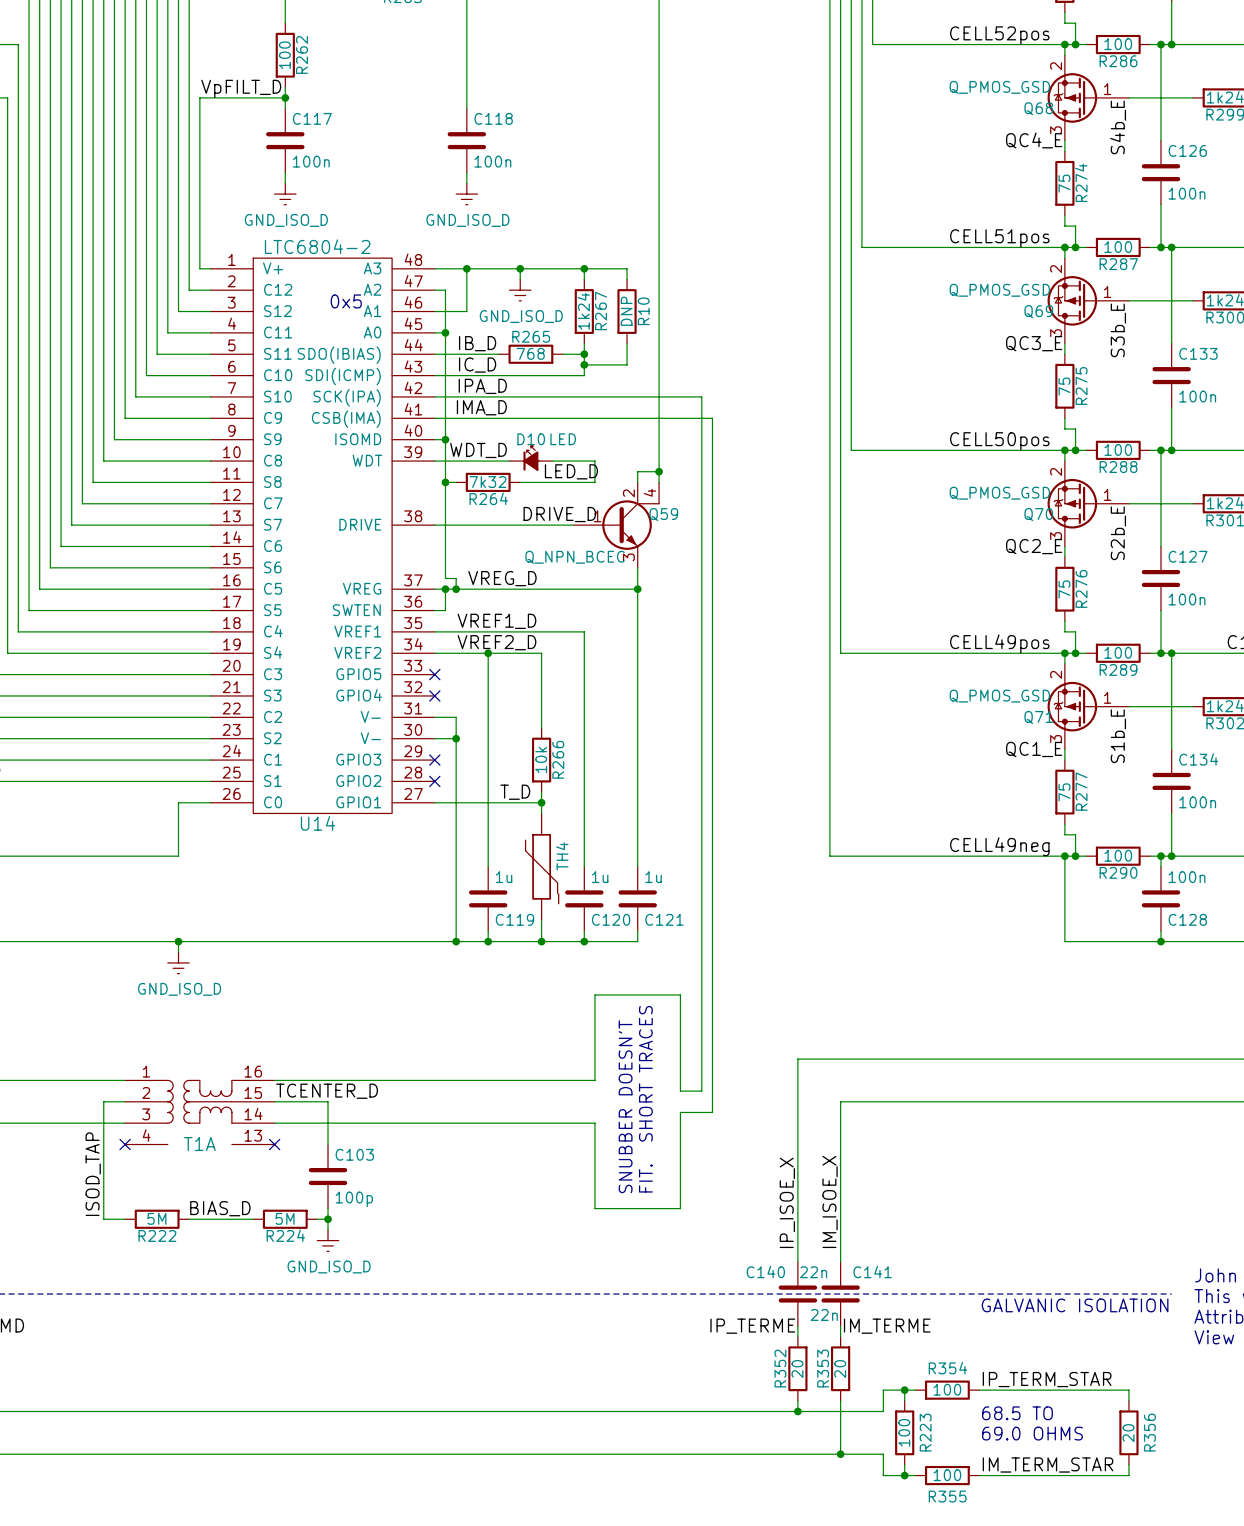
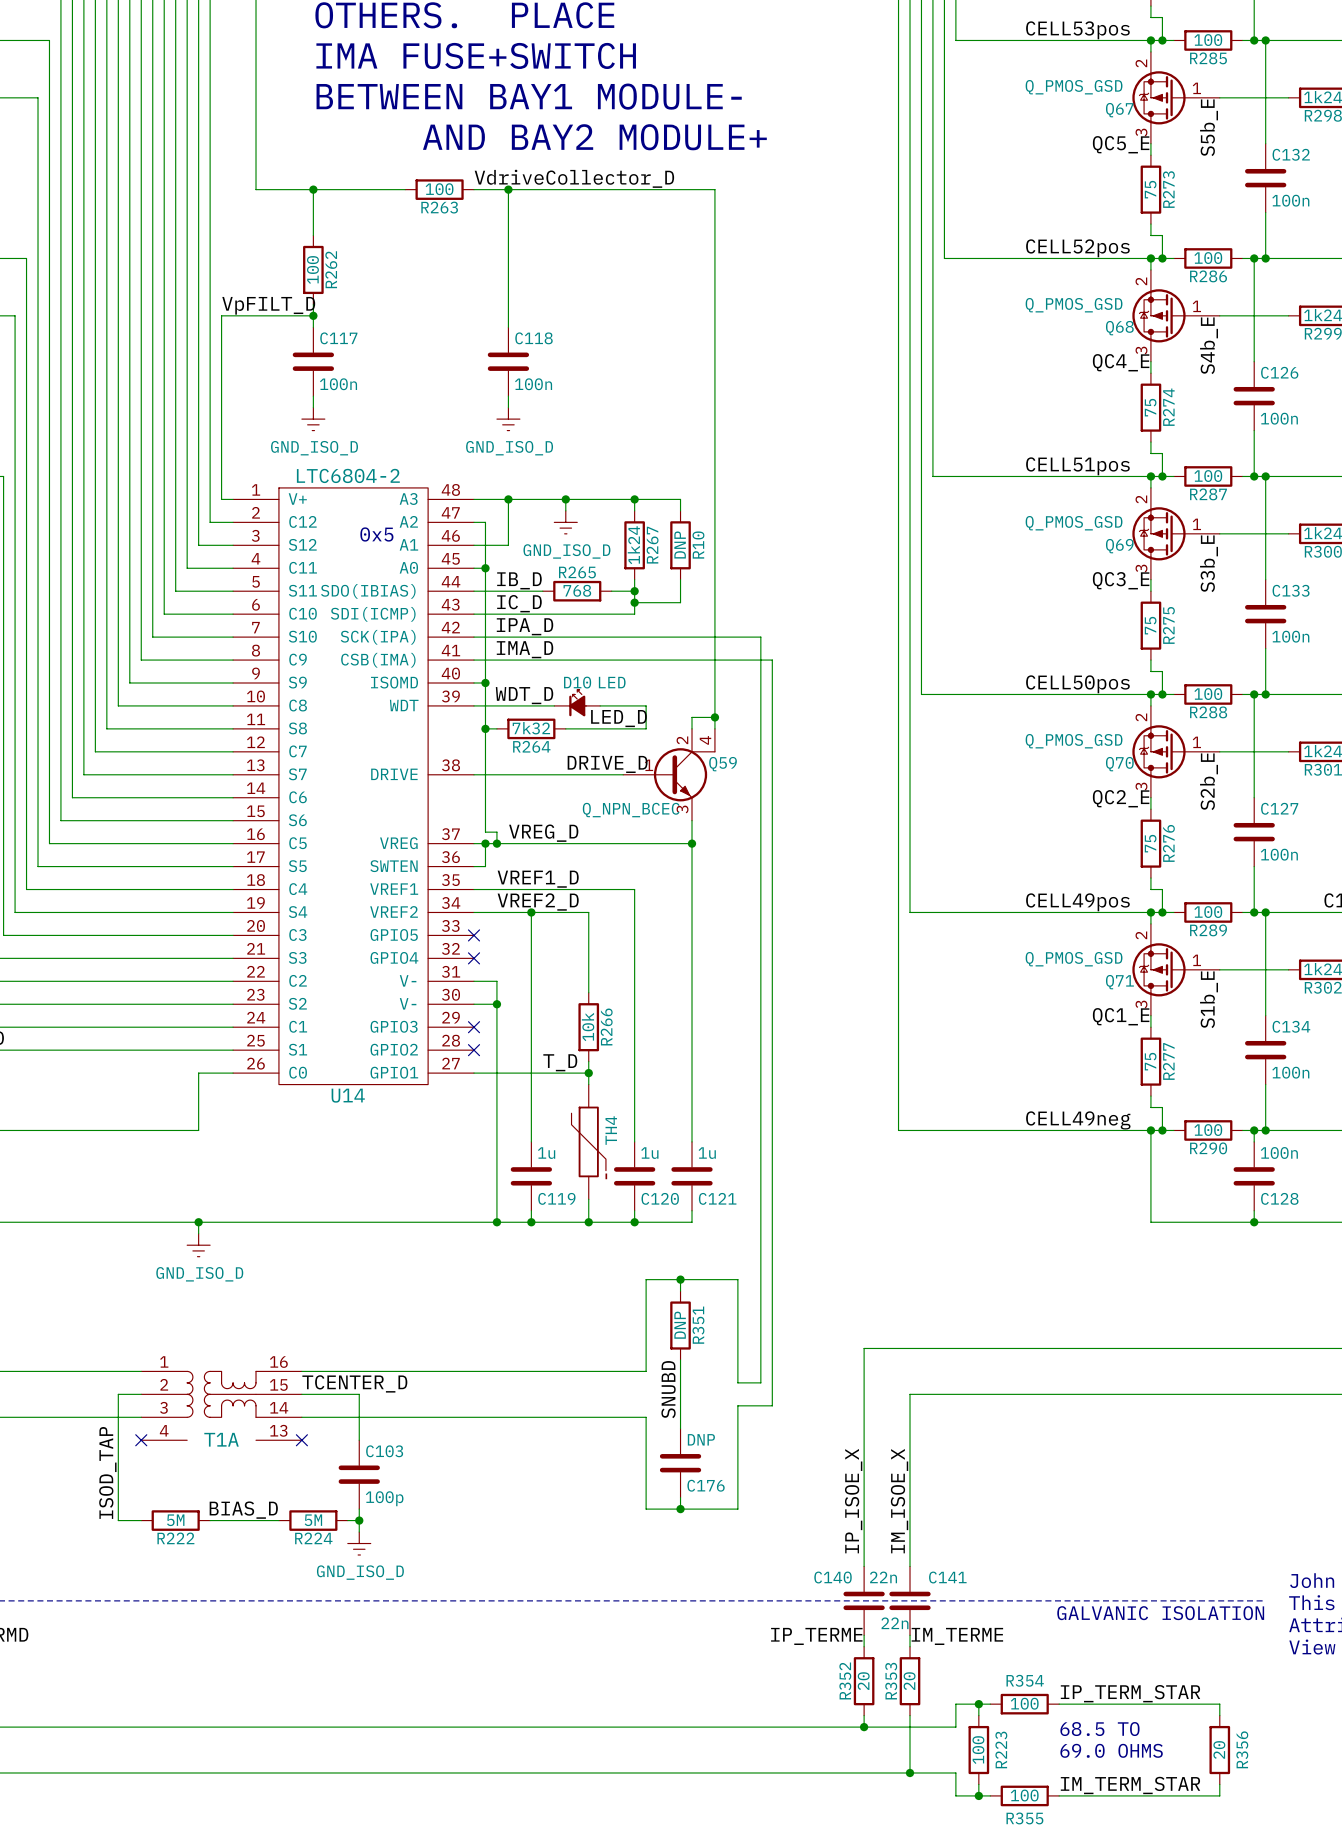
wire: none -> (680, 1279) (680, 1291)
junction: none -> (680, 1279)
R351: none -> DNP (680, 1325)
wire: none -> (680, 1359) (680, 1428)
text: FIT. SHORT TRACES (645, 1099) -> none
label: none -> SNUBD (668, 1389)
text: SNUBBER DOESN'T (625, 1106) -> none
C176: none -> DNP (680, 1463)
wire: none -> (680, 1497) (680, 1509)
junction: none -> (680, 1509)

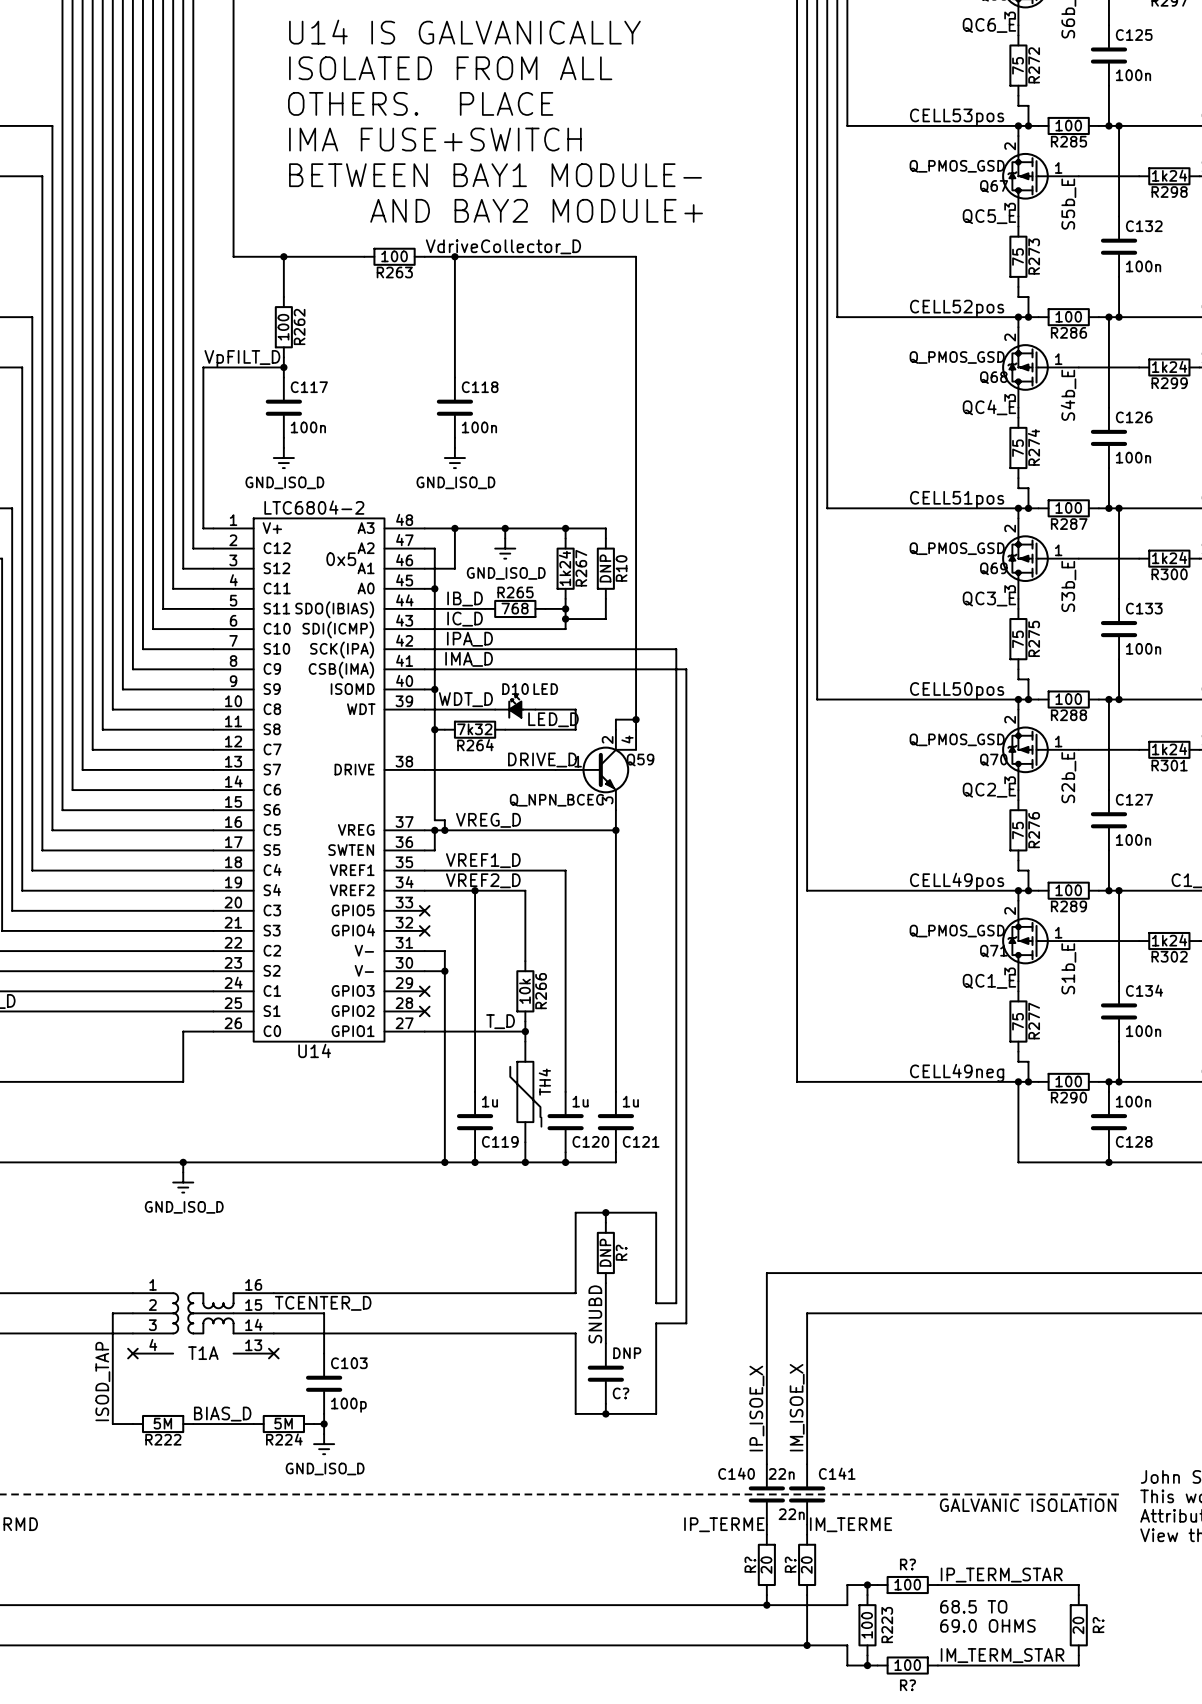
R351 name: R351 (698, 1325) -> R? (621, 1252)
C176 name: C176 (706, 1485) -> C? (621, 1393)
R352 name: R352 (845, 1680) -> R? (750, 1564)
R354 name: R354 (1025, 1680) -> R? (907, 1564)
R353 name: R353 (891, 1681) -> R? (790, 1564)
R356 name: R356 (1242, 1749) -> R? (1098, 1625)
R355 name: R355 (1024, 1818) -> R? (907, 1685)

